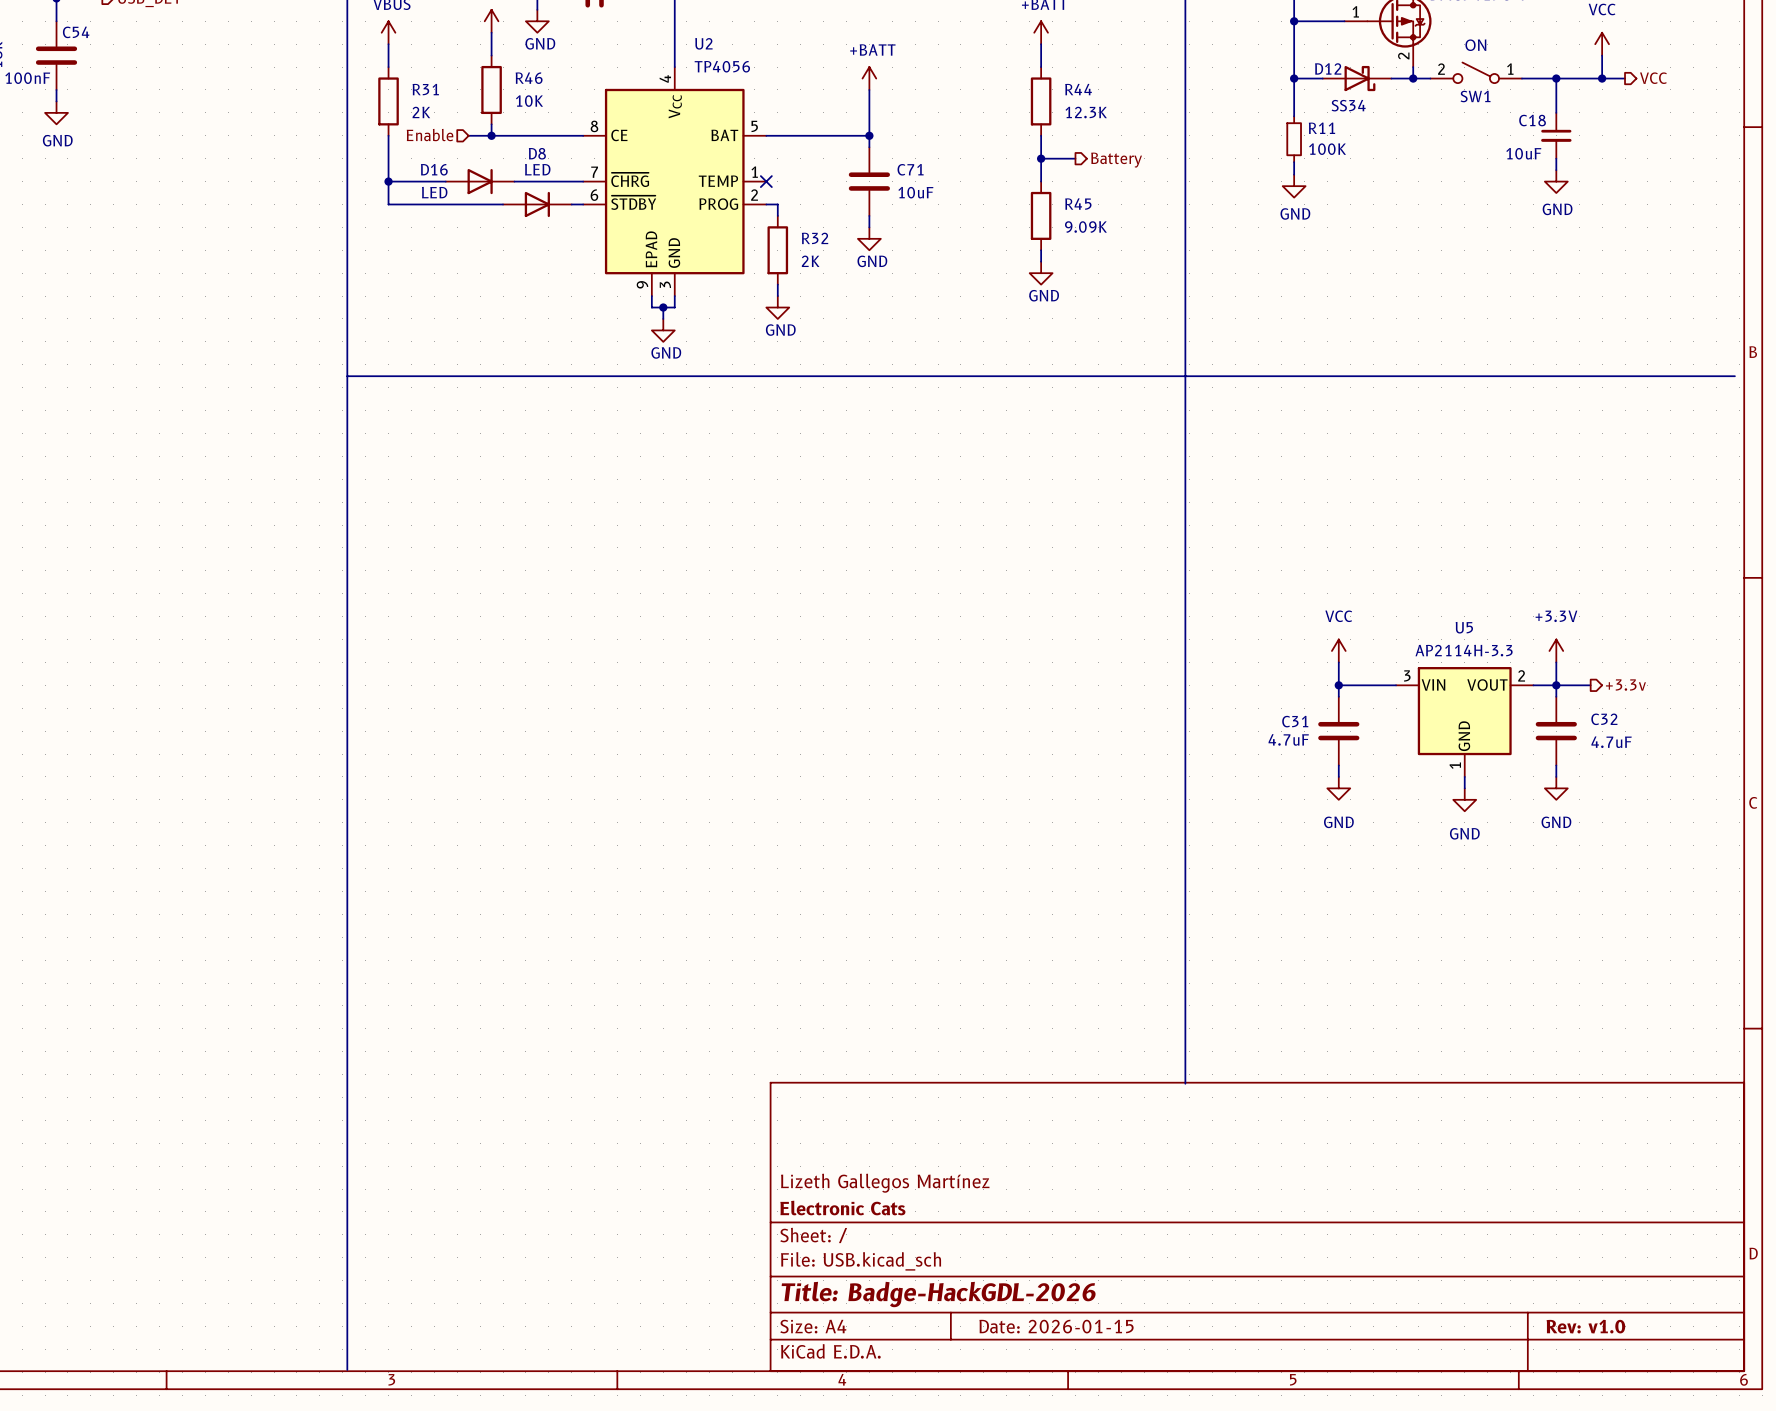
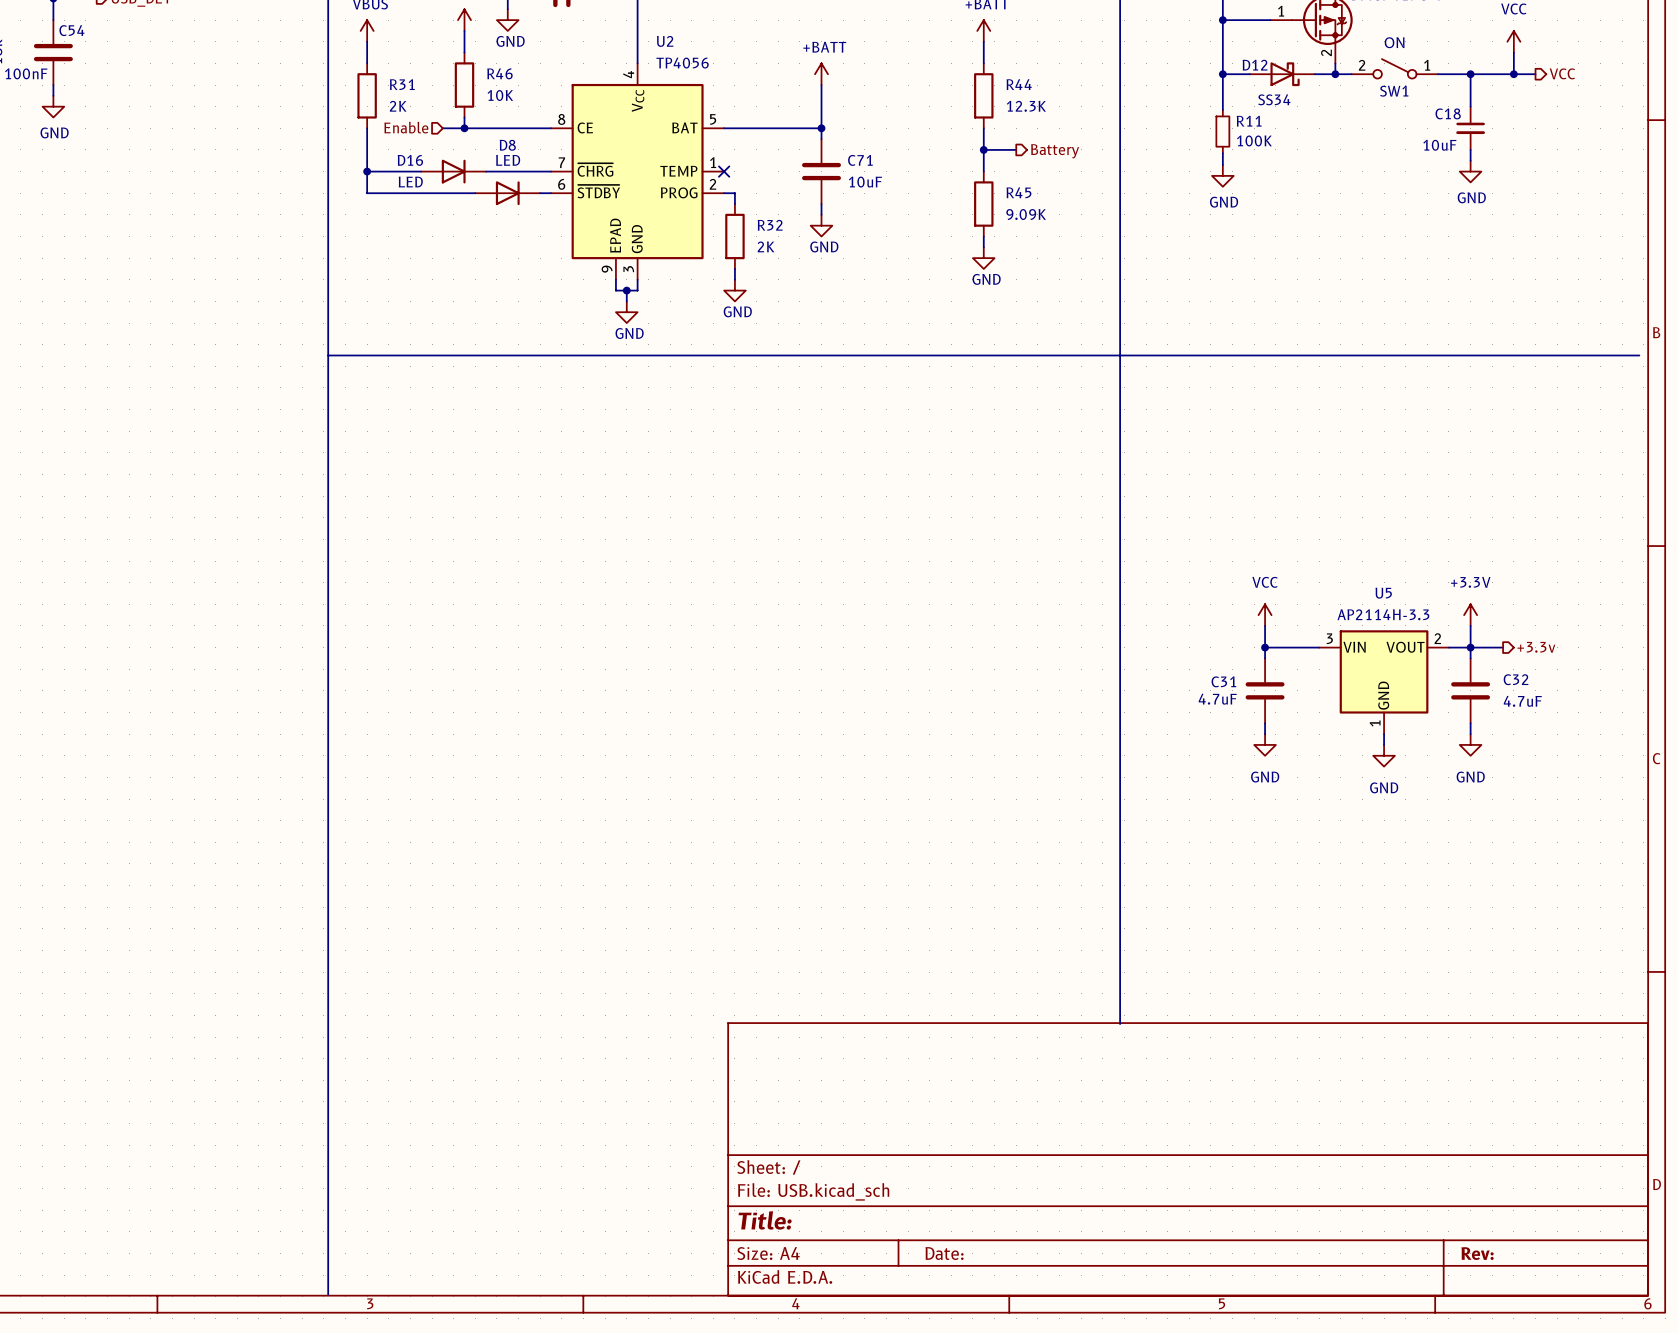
title block: Lizeth Gallegos Martínez (885, 1183) -> none
title block: Electronic Cats (842, 1208) -> none
title block: Title: Badge-HackGDL-2026 (938, 1294) -> Title: (765, 1220)
title block: Date: 2026-01-15 (1056, 1326) -> Date: (944, 1253)
title block: Rev: v1.0 (1585, 1326) -> Rev: (1477, 1253)

